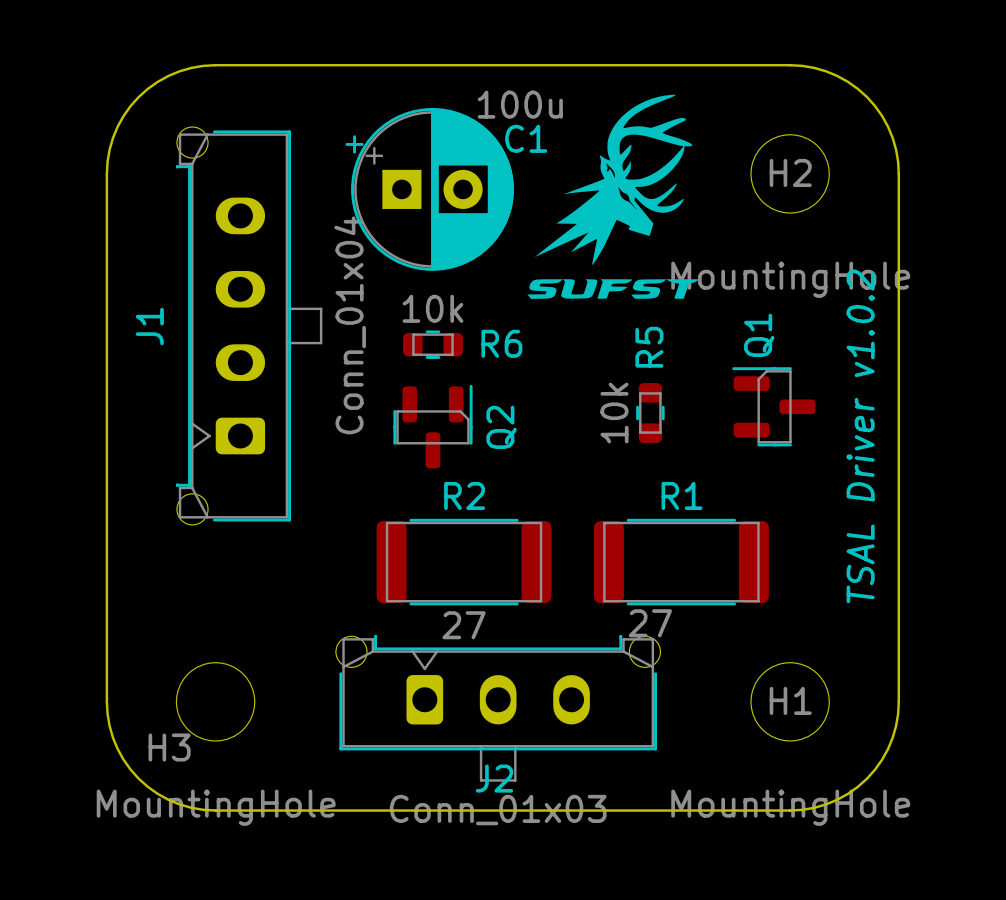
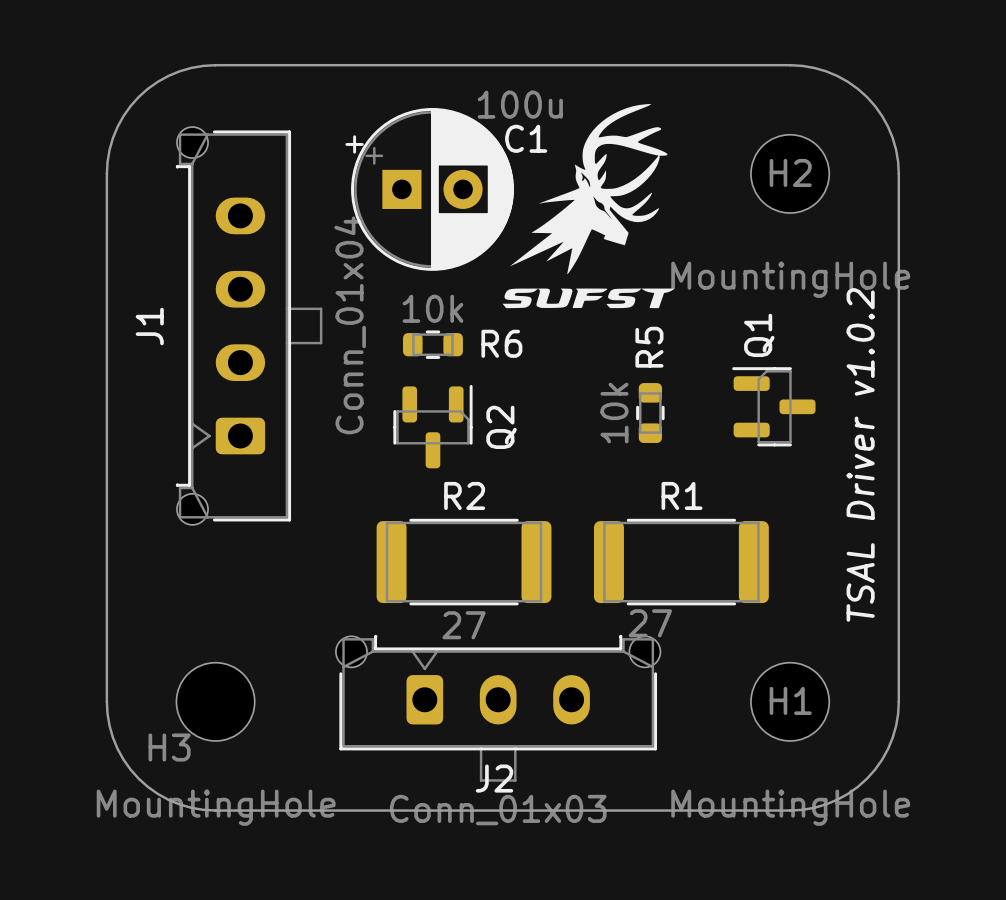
drawing position: (613, 179) -> (588, 189)
drawing position: (613, 289) -> (588, 298)
text position: TSAL Driver v1.0.2 (860, 436) -> TSAL Driver v1.0.2 (860, 454)

